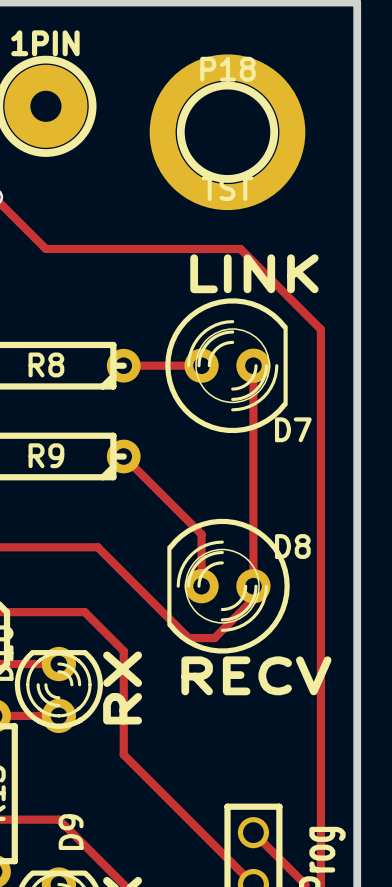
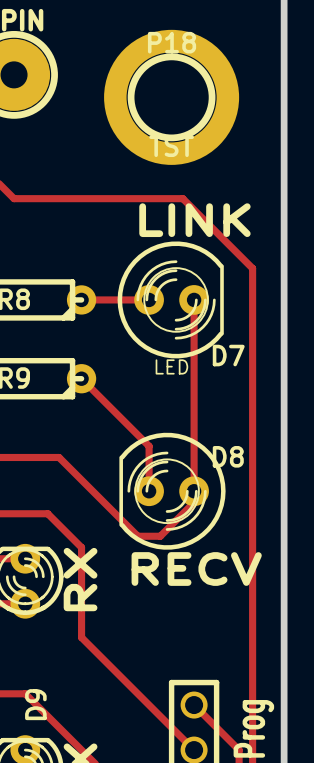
D7 value: none -> LED (171, 366)

